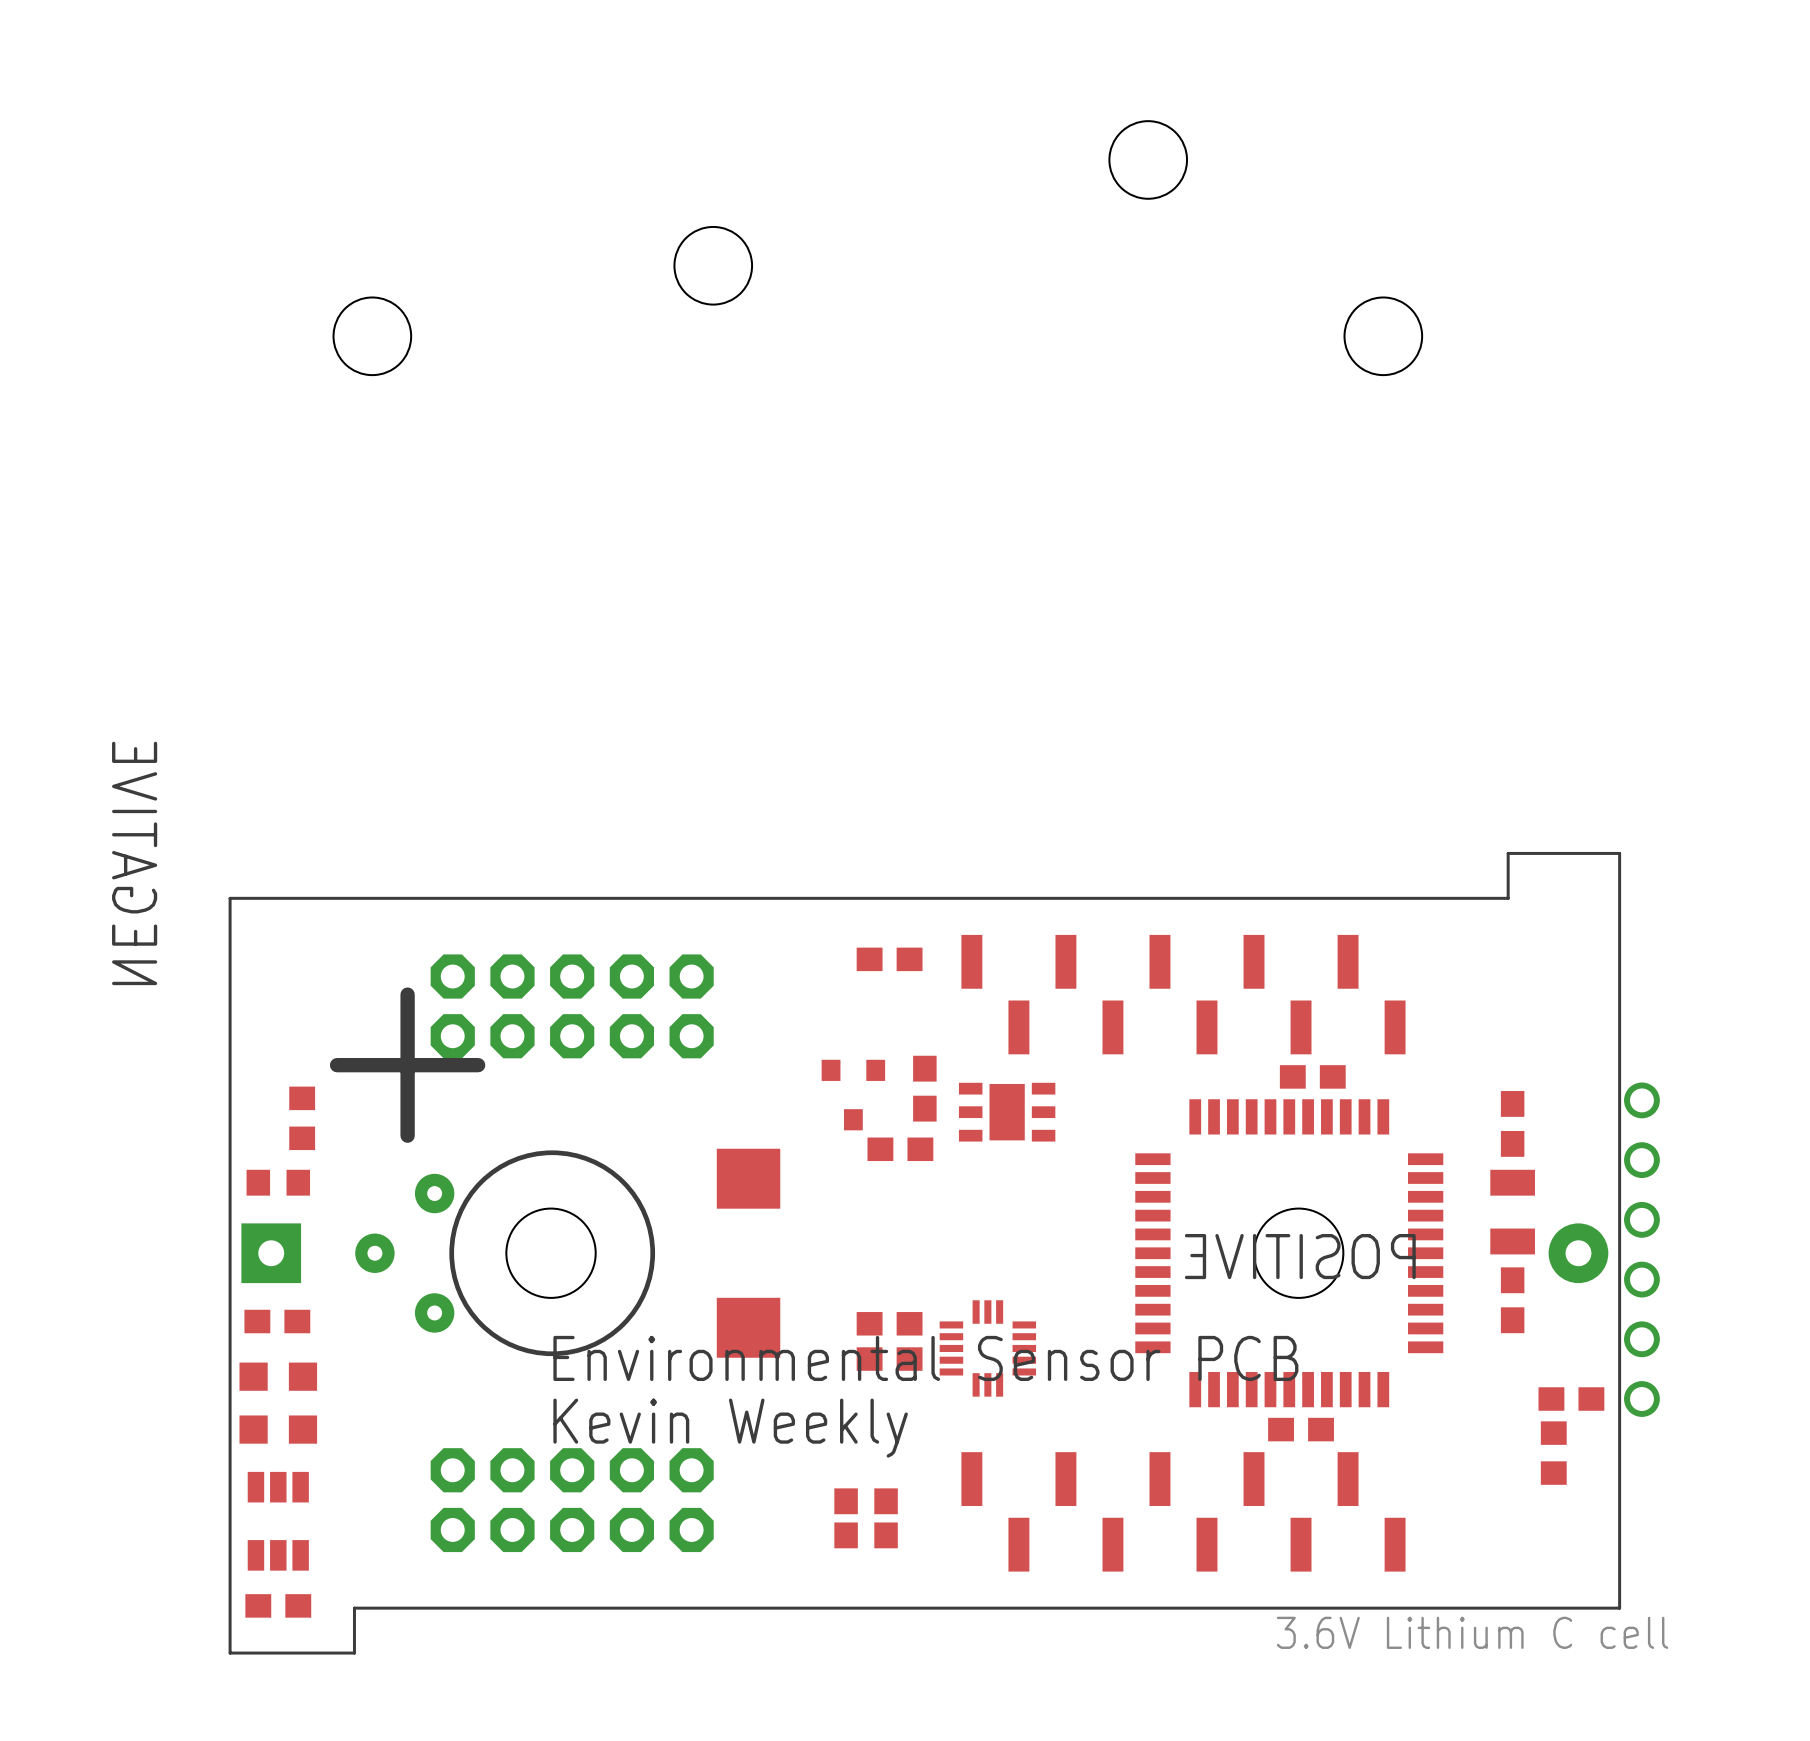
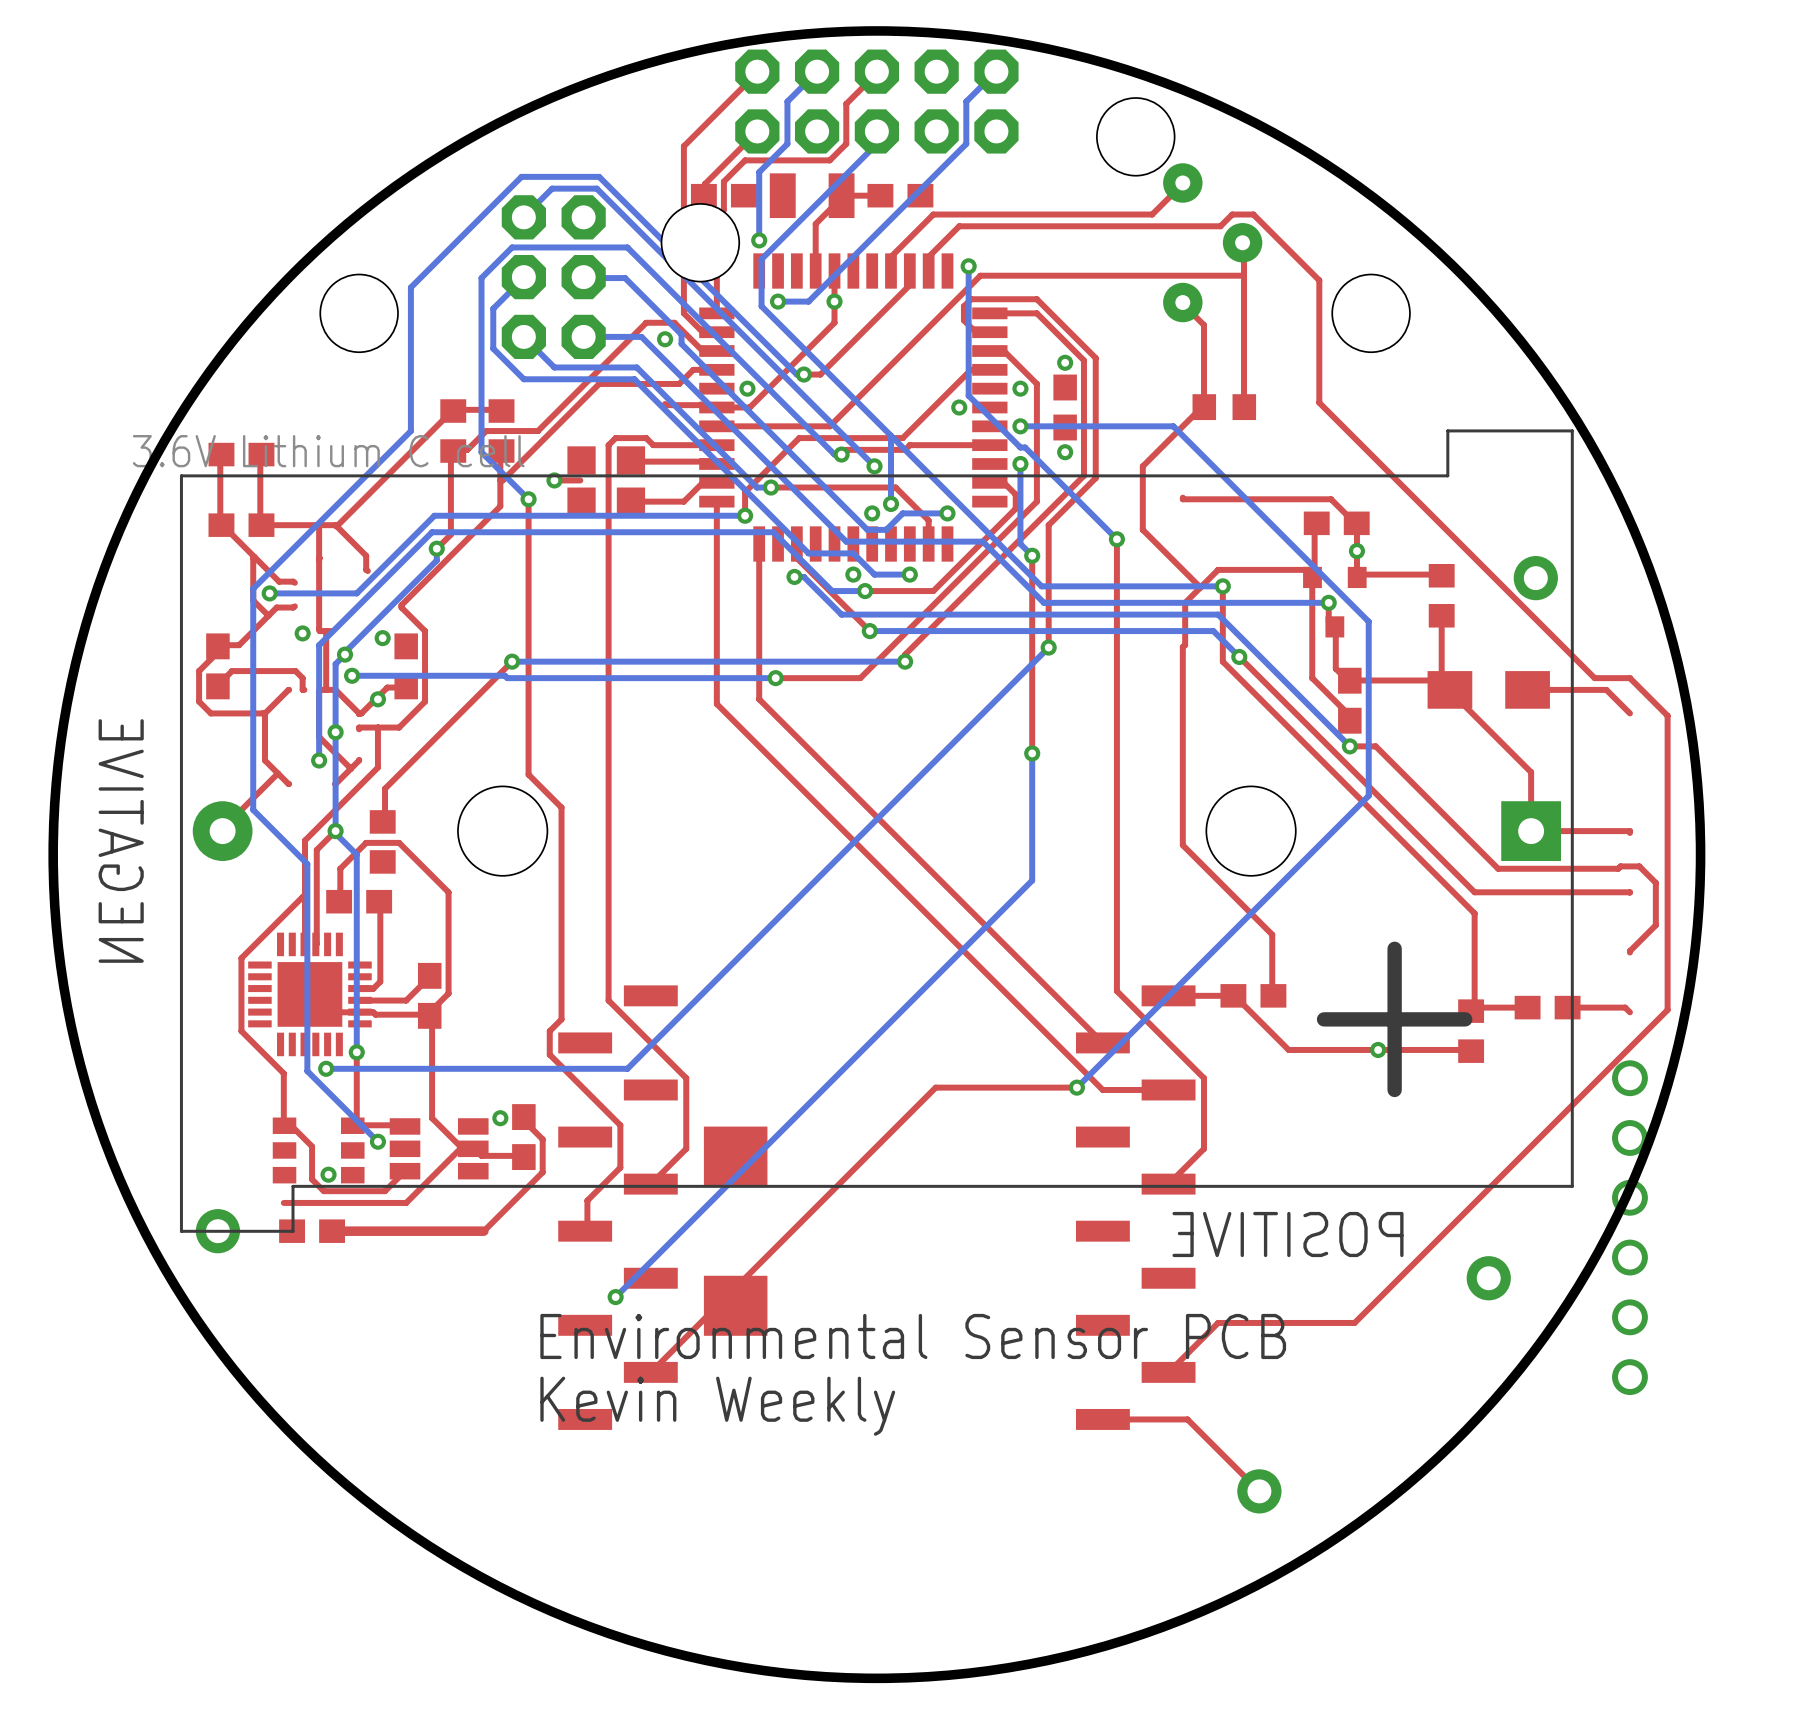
round board edge: none -> [48, 26, 1706, 1684]
top track: none -> (757, 71) (683, 146) (683, 313) (702, 332) (716, 332)
bottom track: none -> (817, 71) (787, 101) (787, 143) (759, 172) (759, 240)
top track: none -> (876, 71) (846, 103) (846, 143) (829, 160) (745, 160) (723, 181) (723, 209) (716, 216) (716, 313)
bottom track: none -> (996, 71) (966, 101) (966, 143) (808, 301) (778, 301)
part: none -> (876, 101)
top track: none -> (757, 131) (705, 183) (703, 195)
bottom track: none -> (876, 131) (876, 143) (761, 259) (761, 306) (891, 435) (891, 503)
top track: none -> (1182, 182) (1152, 214) (933, 214) (891, 256) (891, 271)
part: none -> (723, 195)
part: none -> (812, 195)
top track: none -> (880, 195) (841, 195) (841, 198) (815, 223) (815, 271)
part: none -> (900, 195)
bottom track: none -> (523, 216) (552, 188) (596, 188) (874, 466)
via: none -> (759, 240)
part: none -> (1212, 242)
top track: none -> (1242, 242) (1244, 407)
bottom track: none -> (968, 266) (968, 395) (1020, 447) (1025, 447) (1116, 539)
via: none -> (968, 266)
top track: none -> (834, 271) (834, 322) (749, 407) (665, 403)
top track: none -> (909, 271) (909, 285) (820, 374) (803, 374)
top track: none -> (928, 271) (928, 256) (959, 226) (1220, 226) (1232, 214) (1253, 214) (1319, 280) (1319, 402) (1594, 678) (1629, 678) (1667, 715) (1667, 1009) (1354, 1322) (1218, 1322) (1168, 1372)
top track: none -> (1244, 275) (980, 275) (829, 426) (716, 426)
bottom track: none -> (523, 277) (493, 308) (493, 348) (523, 379) (634, 379) (808, 553) (853, 553) (874, 574) (909, 574)
part: none -> (553, 277)
bottom track: none -> (583, 277) (625, 278) (681, 334) (681, 343) (867, 529) (886, 529) (902, 513) (947, 513)
via: none -> (778, 301)
via: none -> (834, 301)
top track: none -> (1182, 302) (1204, 325) (1204, 407) (1201, 407) (1142, 466) (1142, 529) (1200, 587)
top track: none -> (989, 313) (1036, 313) (1083, 360) (1083, 475) (905, 654) (905, 661)
top track: none -> (989, 332) (975, 332) (963, 320) (963, 306) (971, 299) (1036, 299) (1095, 358) (1095, 478) (1048, 525) (1048, 647)
bottom track: none -> (523, 336) (554, 367) (636, 367) (756, 487) (770, 487)
bottom track: none -> (583, 336) (641, 336) (846, 541) (982, 541) (1043, 602) (1328, 602)
via: none -> (665, 339)
top track: none -> (716, 351) (702, 351) (674, 322) (646, 322) (537, 431) (486, 431) (467, 449) (453, 449) (450, 452) (450, 534) (436, 548)
top track: none -> (989, 351) (1003, 351) (1036, 383) (1036, 501) (860, 678) (775, 678)
via: none -> (1065, 362)
top track: none -> (716, 369) (693, 369) (679, 383) (599, 383) (502, 480) (500, 480)
top track: none -> (989, 369) (971, 369) (902, 438) (799, 438) (745, 492) (745, 515)
bottom track: none -> (803, 374) (796, 374) (599, 176) (521, 176) (410, 287) (410, 431) (253, 588) (253, 809) (307, 864) (307, 1071) (377, 1141)
via: none -> (803, 374)
via: none -> (747, 388)
via: none -> (1020, 388)
part: none -> (1224, 407)
part: none -> (853, 407)
via: none -> (959, 407)
part: none -> (1065, 407)
top track: none -> (501, 411) (453, 409) (336, 526)
bottom track: none -> (1020, 426) (1173, 426) (1368, 621) (1368, 795) (1076, 1087)
via: none -> (1020, 426)
part: none -> (453, 431)
part: none -> (501, 431)
bottom track: none -> (891, 438) (893, 438) (1041, 586) (1222, 586)
top track: none -> (716, 445) (653, 445) (646, 438) (615, 438) (608, 445) (608, 1000) (686, 1078) (686, 1148) (650, 1184)
top track: none -> (989, 445) (909, 445) (905, 449) (846, 449) (841, 454)
top track: none -> (501, 451) (500, 506) (401, 605) (401, 607) (425, 631) (425, 701) (399, 727) (359, 727) (359, 729)
via: none -> (1065, 452)
top track: none -> (221, 454) (221, 525) (279, 581) (294, 582)
part: none -> (241, 454)
top track: none -> (261, 454) (261, 525) (335, 525) (366, 555) (366, 569) (367, 571)
bottom track: none -> (841, 454) (834, 454) (627, 247) (512, 247) (481, 278) (481, 452) (528, 499)
via: none -> (841, 454)
part: none -> (606, 460)
top track: none -> (630, 460) (714, 461) (716, 463)
bottom track: none -> (1020, 463) (1020, 543) (1032, 555)
via: none -> (1020, 463)
via: none -> (874, 466)
via: none -> (554, 480)
top track: none -> (580, 480) (554, 480)
top track: none -> (716, 482) (702, 482) (683, 501) (630, 501)
top track: none -> (989, 482) (1003, 482) (1015, 494) (1015, 508) (933, 591) (865, 591)
top track: none -> (770, 487) (895, 487) (928, 520) (928, 543)
via: none -> (770, 487)
top track: none -> (1182, 497) (1182, 499) (1331, 499) (1356, 523) (1357, 577) (1359, 574) (1441, 575)
top track: none -> (528, 499) (528, 774) (561, 807) (561, 1019) (549, 1031) (549, 1054) (620, 1125) (620, 1167) (587, 1200) (587, 1231) (585, 1231)
via: none -> (528, 499)
part: none -> (606, 501)
top track: none -> (716, 501) (716, 704) (1102, 1089) (1168, 1089)
via: none -> (891, 503)
via: none -> (872, 513)
via: none -> (947, 513)
bottom track: none -> (745, 515) (434, 515) (356, 593) (269, 593)
via: none -> (745, 515)
top track: none -> (1316, 523) (1314, 525) (1314, 576) (1312, 577)
part: none -> (1336, 523)
part: none -> (241, 525)
top track: none -> (319, 525) (319, 558)
top track: none -> (1116, 539) (1116, 991) (1204, 1078) (1204, 1148) (1168, 1184)
via: none -> (1116, 539)
top track: none -> (759, 543) (759, 699) (1102, 1042)
top track: none -> (796, 543) (796, 558) (869, 631)
bottom track: none -> (436, 548) (436, 560) (335, 664) (335, 833) (356, 854) (356, 1052)
via: none -> (436, 548)
via: none -> (1356, 551)
top track: none -> (1032, 555) (1032, 753)
via: none -> (1032, 555)
top track: none -> (254, 556) (253, 600) (268, 615)
top track: none -> (319, 558) (319, 628) (319, 631) (331, 631)
via: none -> (853, 574)
via: none -> (909, 574)
bottom track: none -> (794, 576) (803, 576) (841, 614) (1218, 614) (1349, 746)
via: none -> (794, 576)
top track: none -> (1312, 577) (1312, 678) (1347, 713) (1347, 720) (1349, 720)
top track: none -> (1312, 577) (1312, 569) (1218, 569) (1185, 602) (1185, 645) (1182, 646) (1182, 845) (1272, 934) (1273, 995)
part: none -> (1535, 578)
top track: none -> (1222, 586) (1222, 661) (1474, 913) (1474, 1005) (1471, 1011) (1474, 1007) (1527, 1007)
via: none -> (1222, 586)
bottom track: none -> (865, 591) (832, 591) (773, 532) (432, 532) (319, 645) (319, 760)
via: none -> (865, 591)
via: none -> (269, 593)
part: none -> (1441, 595)
part: none -> (1334, 602)
top track: none -> (1328, 602) (1328, 621) (1335, 628) (1335, 668) (1347, 680) (1439, 680) (1449, 689)
via: none -> (1328, 602)
top track: none -> (294, 606) (276, 607) (239, 645) (217, 645) (215, 647) (215, 654) (199, 671) (199, 701) (210, 713) (264, 714)
top track: none -> (1441, 615) (1441, 682) (1449, 689)
top track: none -> (326, 631) (326, 689)
bottom track: none -> (869, 631) (1213, 631) (1239, 656)
via: none -> (869, 631)
via: none -> (302, 633)
via: none -> (382, 638)
bottom track: none -> (1048, 647) (627, 1068) (326, 1068)
via: none -> (1048, 647)
via: none -> (345, 654)
top track: none -> (1239, 656) (1474, 892) (1629, 892)
via: none -> (1239, 656)
top track: none -> (512, 661) (385, 788) (385, 821) (382, 821)
via: none -> (512, 661)
bottom track: none -> (905, 661) (512, 661)
via: none -> (905, 661)
part: none -> (217, 666)
part: none -> (406, 666)
bottom track: none -> (352, 675) (775, 678)
via: none -> (352, 675)
via: none -> (775, 678)
top track: none -> (217, 686) (232, 671) (295, 671) (302, 678) (302, 689) (304, 689)
top track: none -> (406, 686) (387, 687) (359, 714) (335, 689) (319, 689) (319, 736) (350, 768)
top track: none -> (289, 689) (264, 713) (264, 760) (289, 784)
top track: none -> (1449, 689) (1531, 772) (1531, 831) (1629, 831) (1629, 832)
part: none -> (1488, 689)
top track: none -> (1527, 689) (1606, 689) (1629, 713)
via: none -> (377, 699)
part: none -> (1349, 700)
top track: none -> (377, 727) (377, 767) (305, 840) (304, 944)
via: none -> (335, 732)
top track: none -> (1349, 746) (1375, 746) (1498, 868) (1618, 868) (1620, 866) (1639, 866) (1655, 882) (1655, 925) (1629, 952)
via: none -> (1349, 746)
bottom track: none -> (1032, 753) (1032, 880) (615, 1297)
via: none -> (1032, 753)
top track: none -> (359, 759) (335, 784)
via: none -> (319, 760)
top track: none -> (277, 773) (222, 828) (222, 831)
top track: none -> (335, 831) (316, 849) (315, 944)
via: none -> (335, 831)
part: none -> (382, 841)
top track: none -> (305, 897) (302, 897) (241, 958) (241, 1031) (283, 1073) (284, 1125) (293, 1127) (312, 1146) (312, 1179) (323, 1191) (385, 1191) (405, 1171)
top track: none -> (339, 901) (340, 868) (366, 842) (399, 842) (448, 892) (448, 993) (429, 1012) (429, 1015) (432, 1017) (432, 1118) (460, 1146) (472, 1146) (473, 1148)
part: none -> (359, 901)
top track: none -> (380, 901) (380, 981) (373, 988) (359, 988)
part: (889, 959) -> none
part: (1183, 994) -> none
top track: none -> (429, 975) (406, 1000) (359, 1000)
part: (572, 1006) -> none
part: none -> (309, 994)
top track: none -> (312, 995) (328, 1012) (429, 1014)
part: none -> (429, 995)
top track: none -> (1168, 995) (1234, 995) (1288, 1049) (1471, 1051)
top track: none -> (1567, 1007) (1625, 1007) (1629, 1012)
part: none -> (1471, 1031)
via: none -> (1378, 1049)
top track: none -> (356, 1052) (356, 1122) (352, 1125) (405, 1126)
via: none -> (356, 1052)
part position: (1312, 1076) -> (1253, 995)
part: (924, 1088) -> none
via: none -> (326, 1068)
part: (853, 1095) -> none
top track: none -> (1076, 1087) (935, 1087) (650, 1372)
via: none -> (1076, 1087)
part: (1007, 1112) -> none
part: (302, 1118) -> none
part rotation: 0° (1512, 1123) -> 90° clockwise (1547, 1007)
part position: (1512, 1123) -> (1547, 1007)
top track: none -> (523, 1117) (523, 1120) (542, 1139) (542, 1172) (483, 1231) (332, 1231)
via: none -> (500, 1118)
part: (900, 1149) -> none
drawing: [449, 1150, 656, 1357] -> none
part: none -> (523, 1137)
via: none -> (377, 1141)
part: none -> (318, 1150)
top track: none -> (523, 1157) (481, 1155) (474, 1148) (460, 1148) (406, 1202) (283, 1202)
part: (278, 1182) -> none
via: none -> (328, 1174)
part: (1512, 1212) -> none
part: none -> (618, 1207)
part: none -> (1135, 1207)
part: none -> (217, 1231)
part: (404, 1253) -> none
part rotation: 0° (924, 1253) -> 180° (876, 831)
part: (1289, 1253) -> none
part footprint: [1500, 1267, 1525, 1334] -> [1466, 1256, 1511, 1301]
via: none -> (615, 1297)
part position: (277, 1321) -> (312, 1231)
part: (889, 1323) -> none
part: (987, 1348) -> none
part: (889, 1359) -> none
part: (278, 1376) -> none
part: (1571, 1399) -> none
part: (278, 1429) -> none
part: (1301, 1429) -> none
top track: none -> (1102, 1419) (1187, 1419) (1259, 1491)
part: (1553, 1453) -> none
part: (572, 1500) -> none
part: (866, 1501) -> none
part: (1183, 1511) -> none
part: none -> (1259, 1491)
part rotation: 0° (278, 1521) -> 90° clockwise (439, 1148)
part position: (278, 1521) -> (439, 1148)
part: (866, 1535) -> none
part: (278, 1605) -> none

